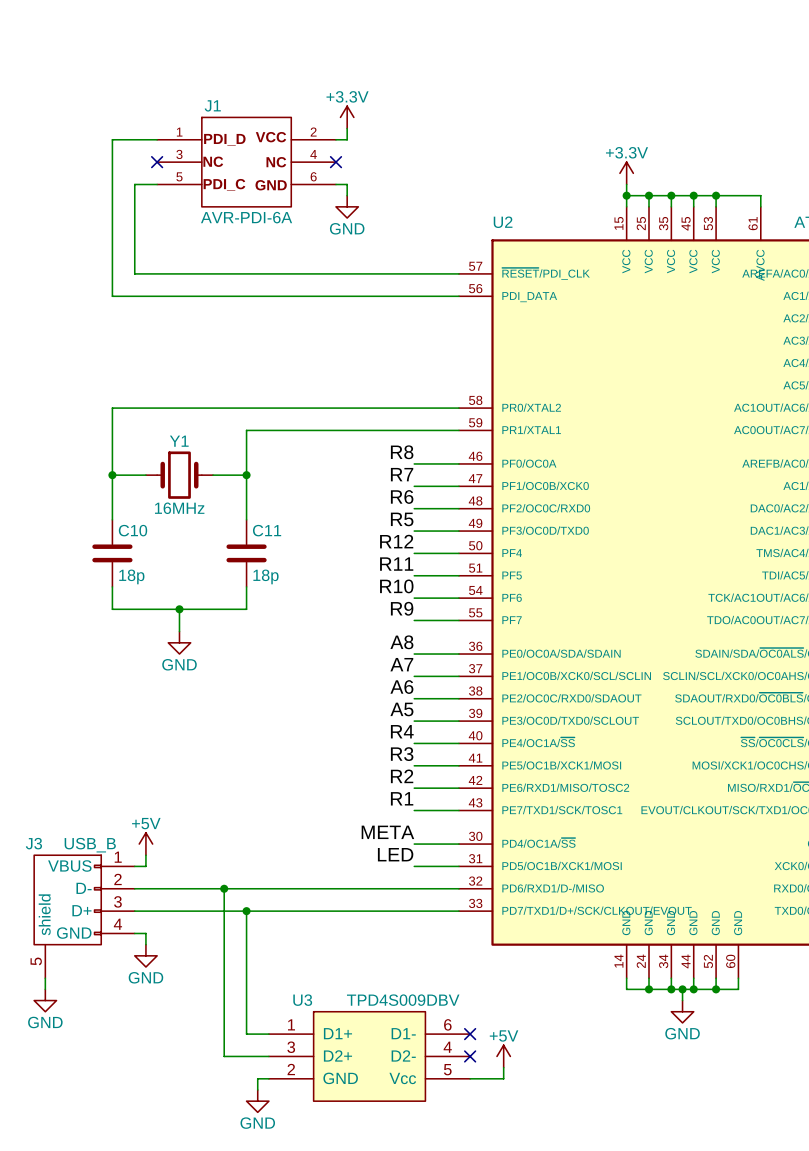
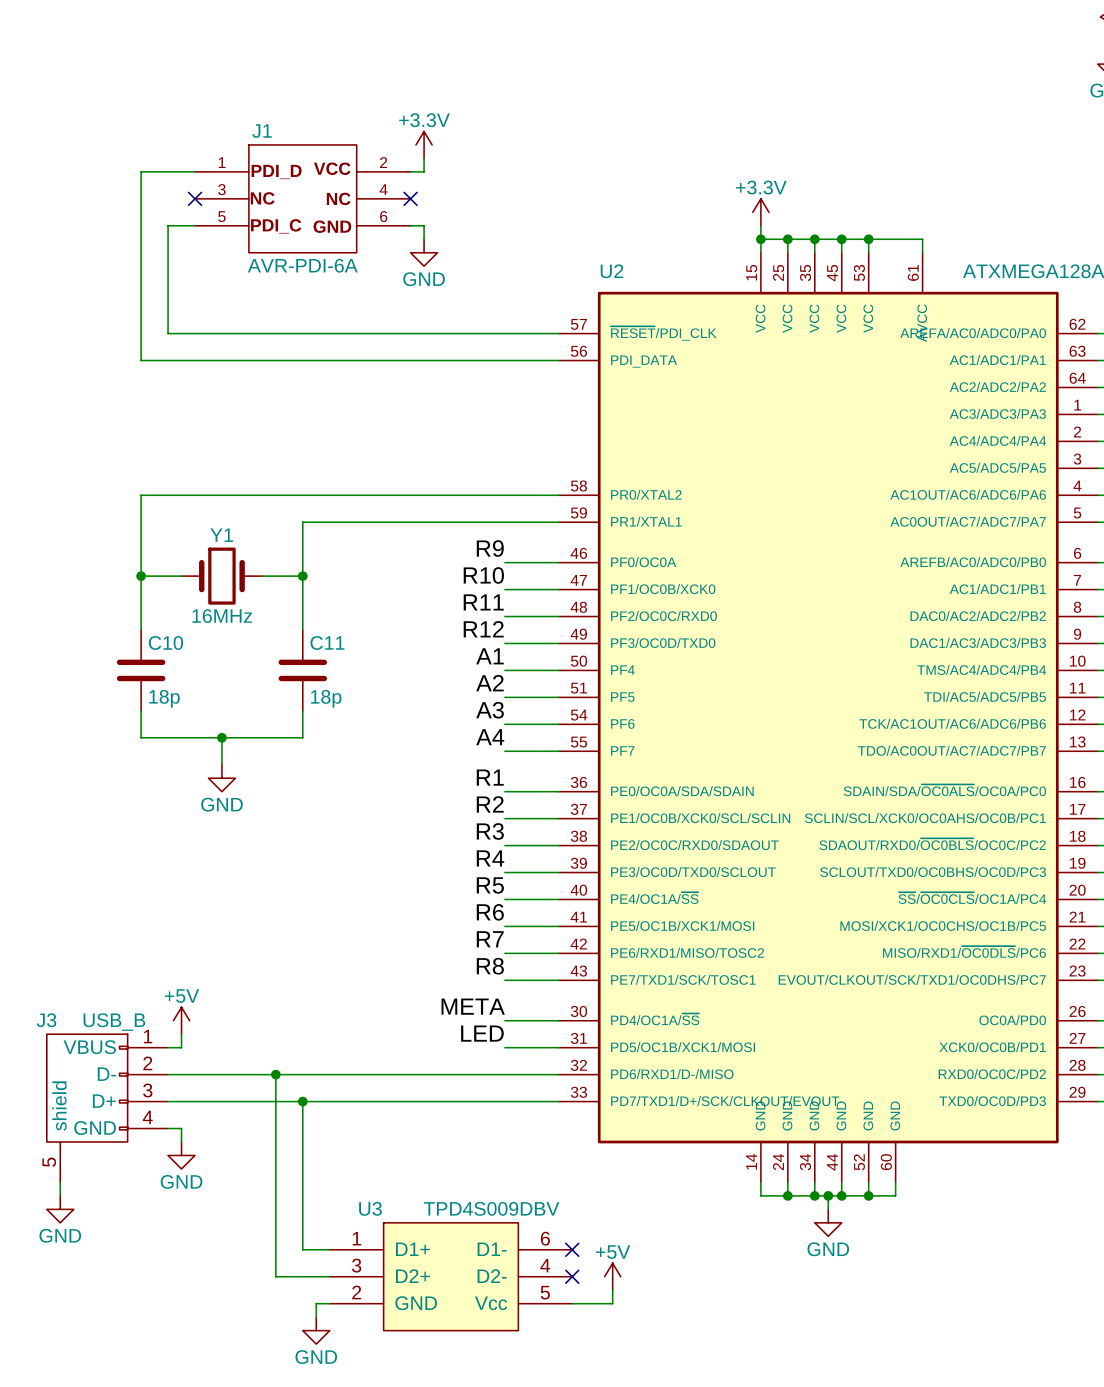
label: R8 (402, 452) -> R9 (490, 548)
label: R7 (402, 474) -> R10 (483, 575)
label: R6 (402, 496) -> R11 (483, 602)
label: R5 (402, 519) -> R12 (483, 629)
label: R12 (396, 541) -> A1 (489, 656)
label: R11 (396, 564) -> A2 (489, 683)
label: R10 (396, 586) -> A3 (490, 710)
label: R9 (402, 608) -> A4 (490, 737)
label: A8 (401, 642) -> R1 (490, 777)
label: A7 (401, 664) -> R2 (490, 804)
label: A6 (401, 687) -> R3 (490, 831)
label: A5 (401, 709) -> R4 (490, 858)
label: R4 (402, 731) -> R5 (490, 885)
label: R3 (402, 754) -> R6 (490, 912)
label: R2 (402, 776) -> R7 (490, 939)
label: R1 (402, 798) -> R8 (490, 966)

